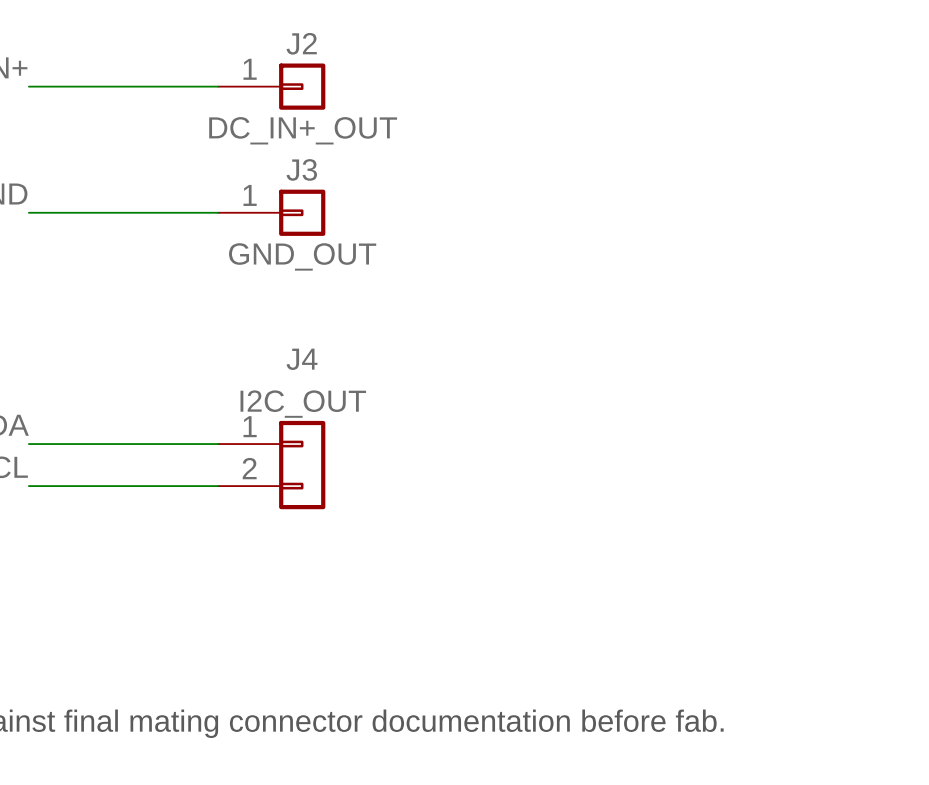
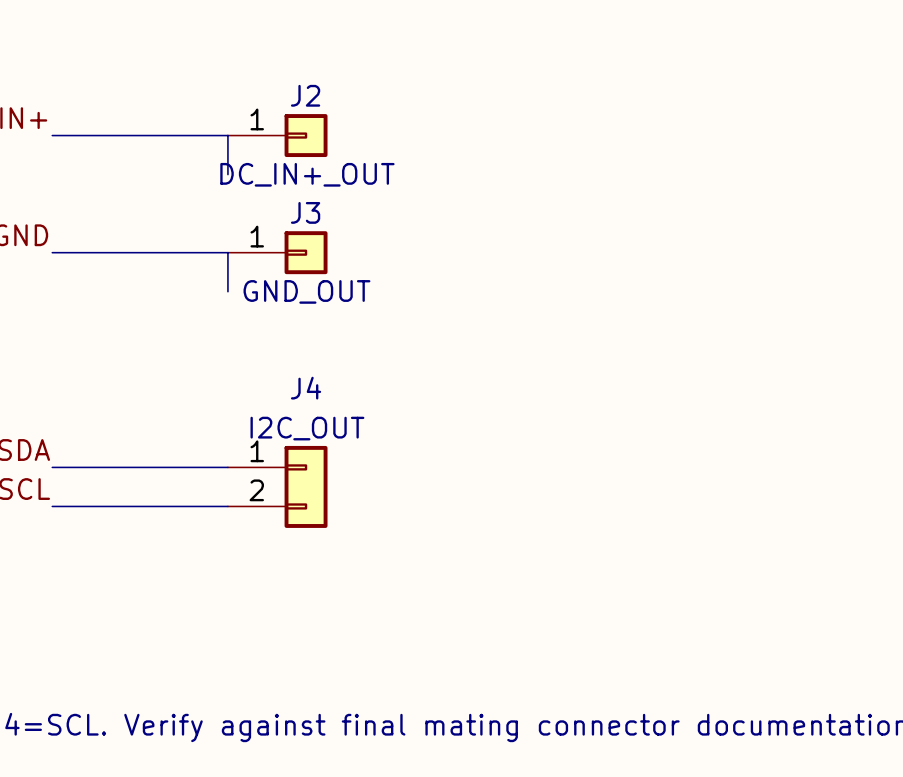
wire: none -> (227, 135) (227, 174)
wire: none -> (227, 252) (227, 291)

